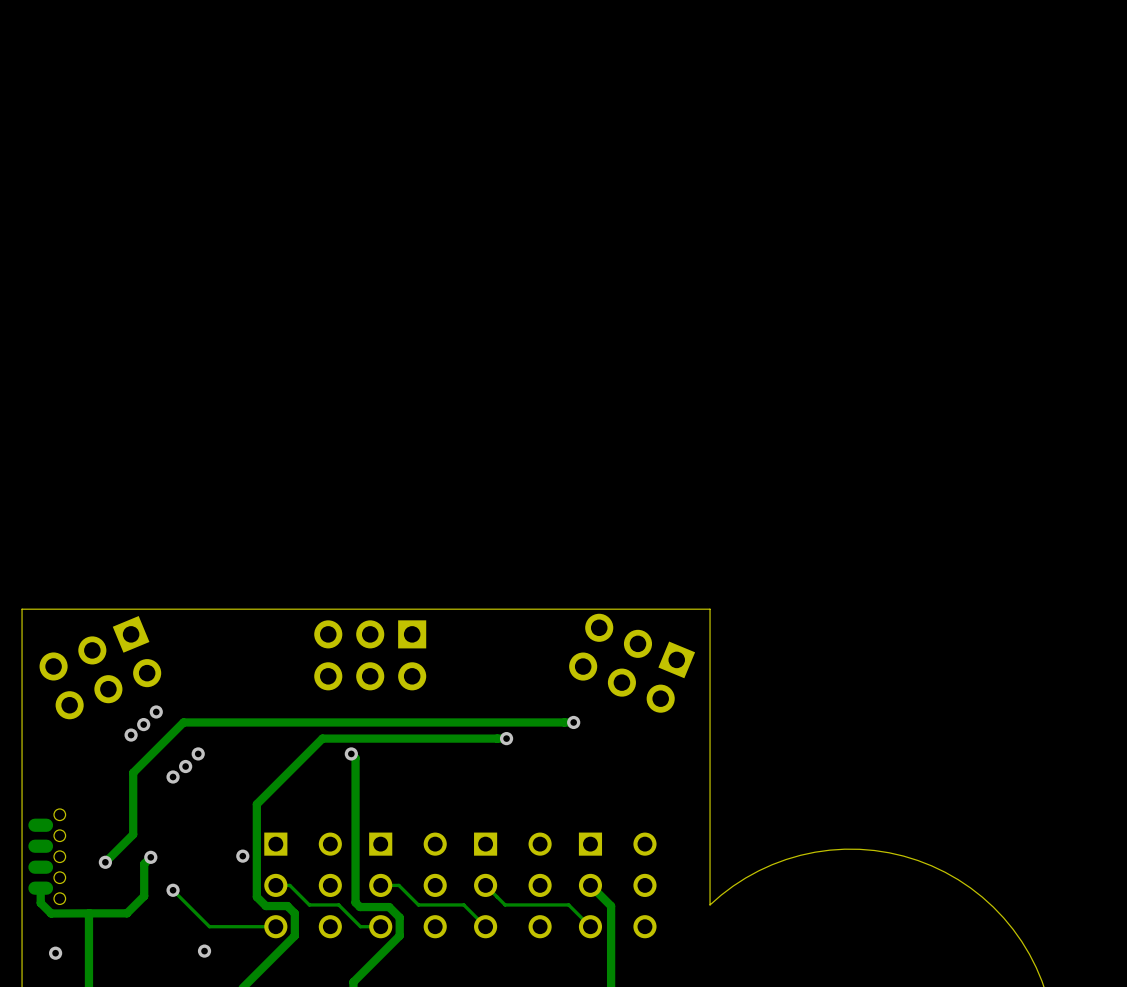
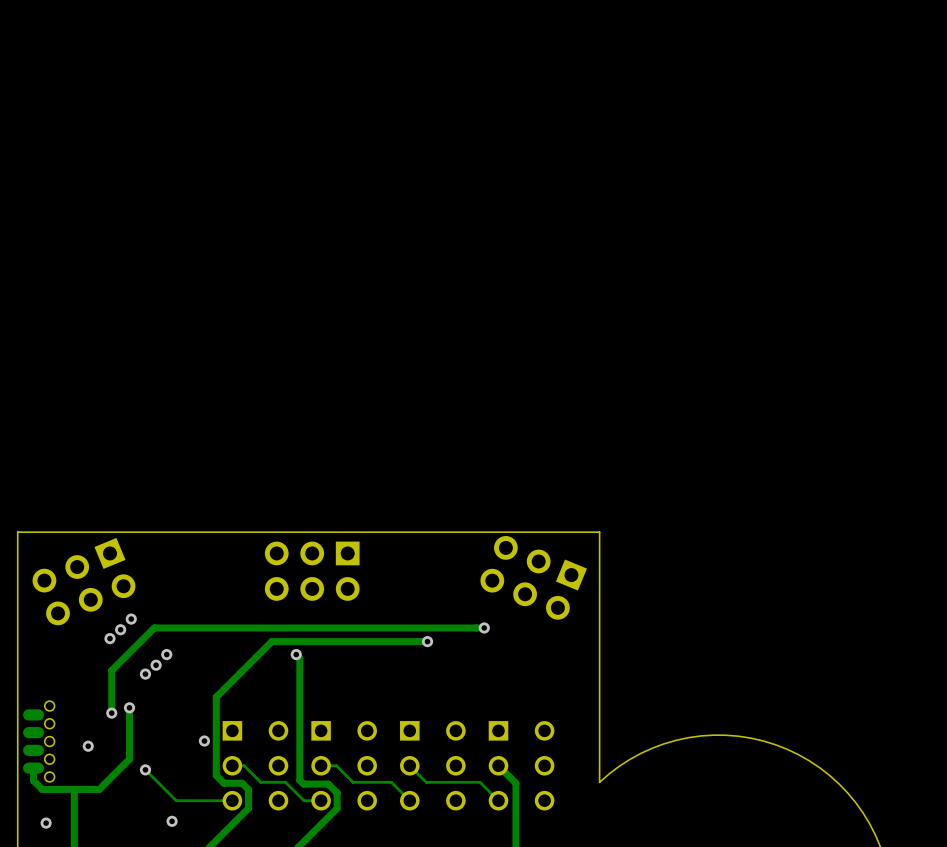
via: none -> (129, 707)
track: (133, 823) (133, 834) (105, 862) -> none
via: none -> (111, 713)
track: (150, 857) (144, 863) (144, 896) (127, 913) (89, 913) -> (129, 707) (129, 759) (99, 789) (74, 789)
via: (150, 857) -> none

